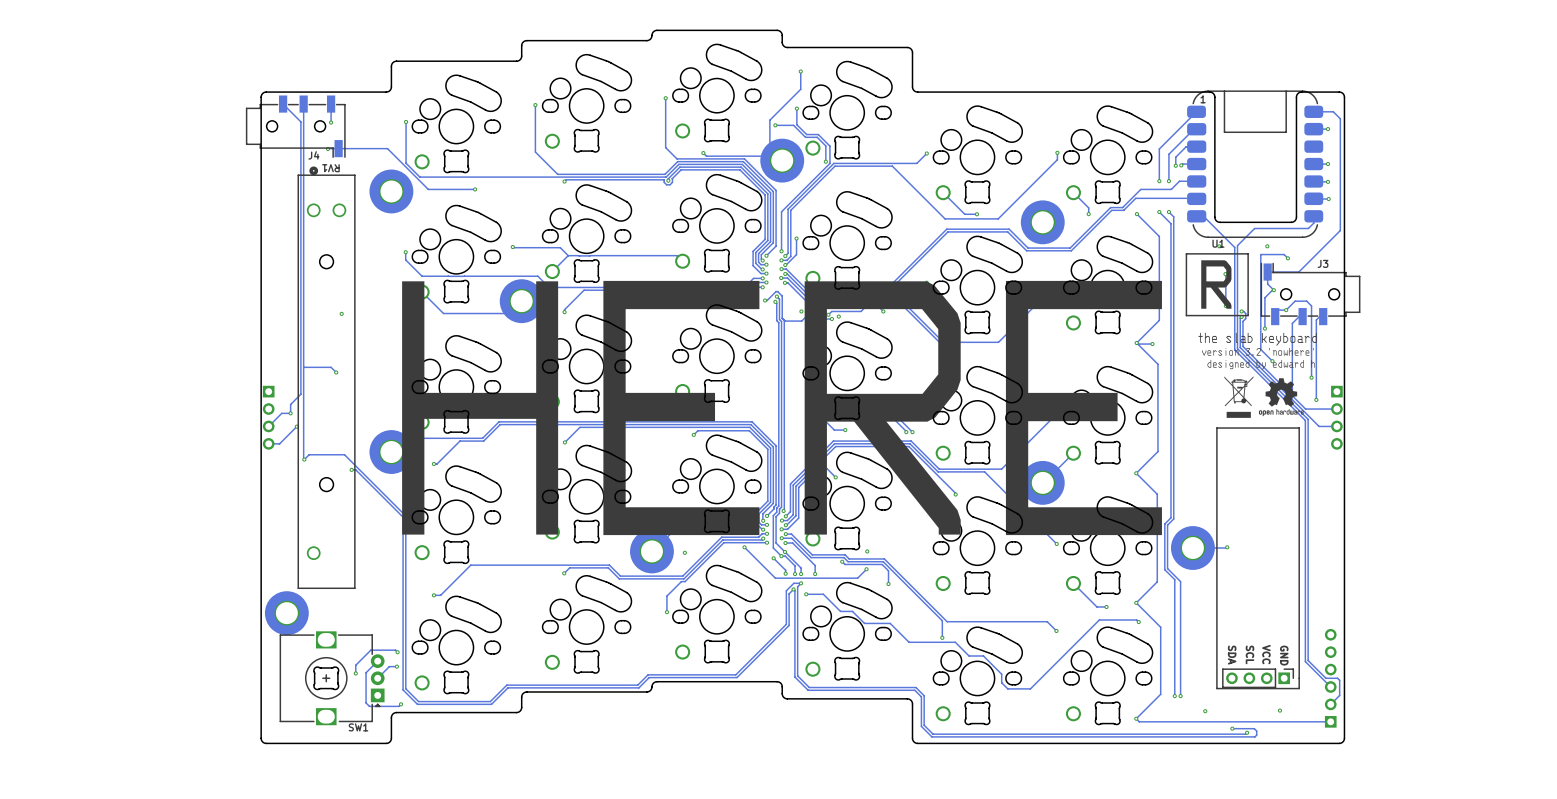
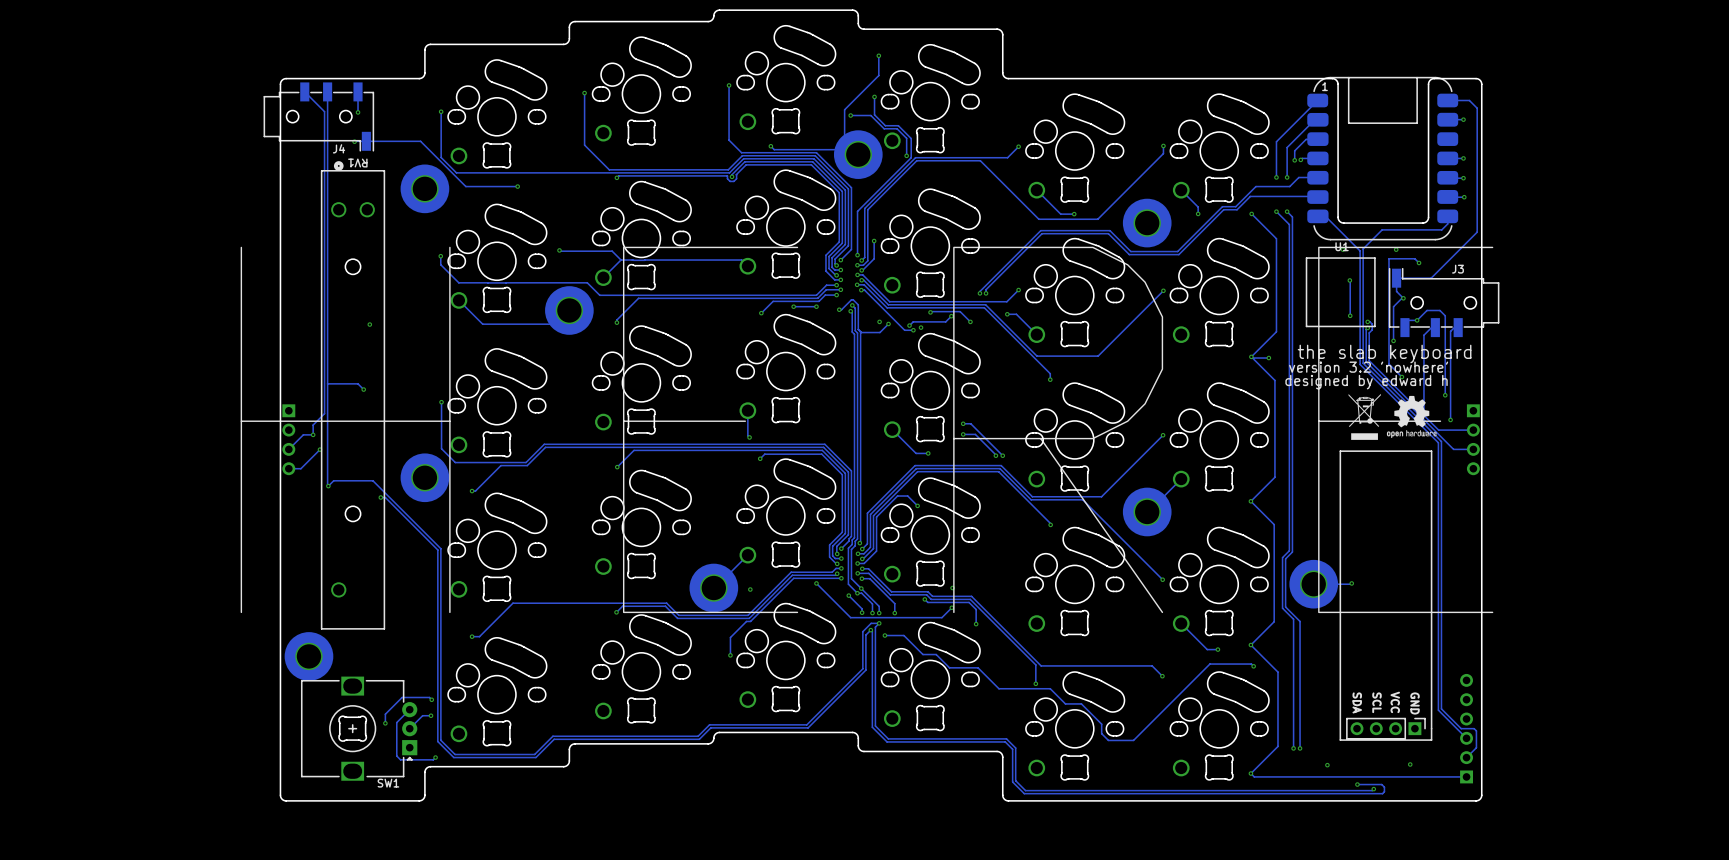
drawing: [1201, 260, 1232, 309] -> none
drawing: [603, 280, 760, 536] -> none
drawing: [1005, 280, 1162, 536] -> none
drawing: [402, 281, 559, 535] -> none
drawing: [804, 281, 961, 535] -> none
drawing: [1198, 332, 1317, 370] -> none
text: none -> the slab keyboard (1384, 353)
text: none -> version 3.2 'nowhere' (1368, 367)
text: none -> designed by edward h (1366, 382)
text: none -> HERE (866, 429)

